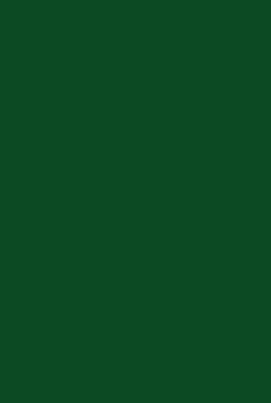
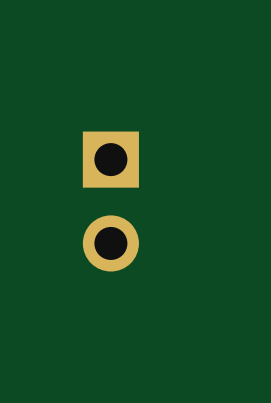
part: none -> (110, 201)

